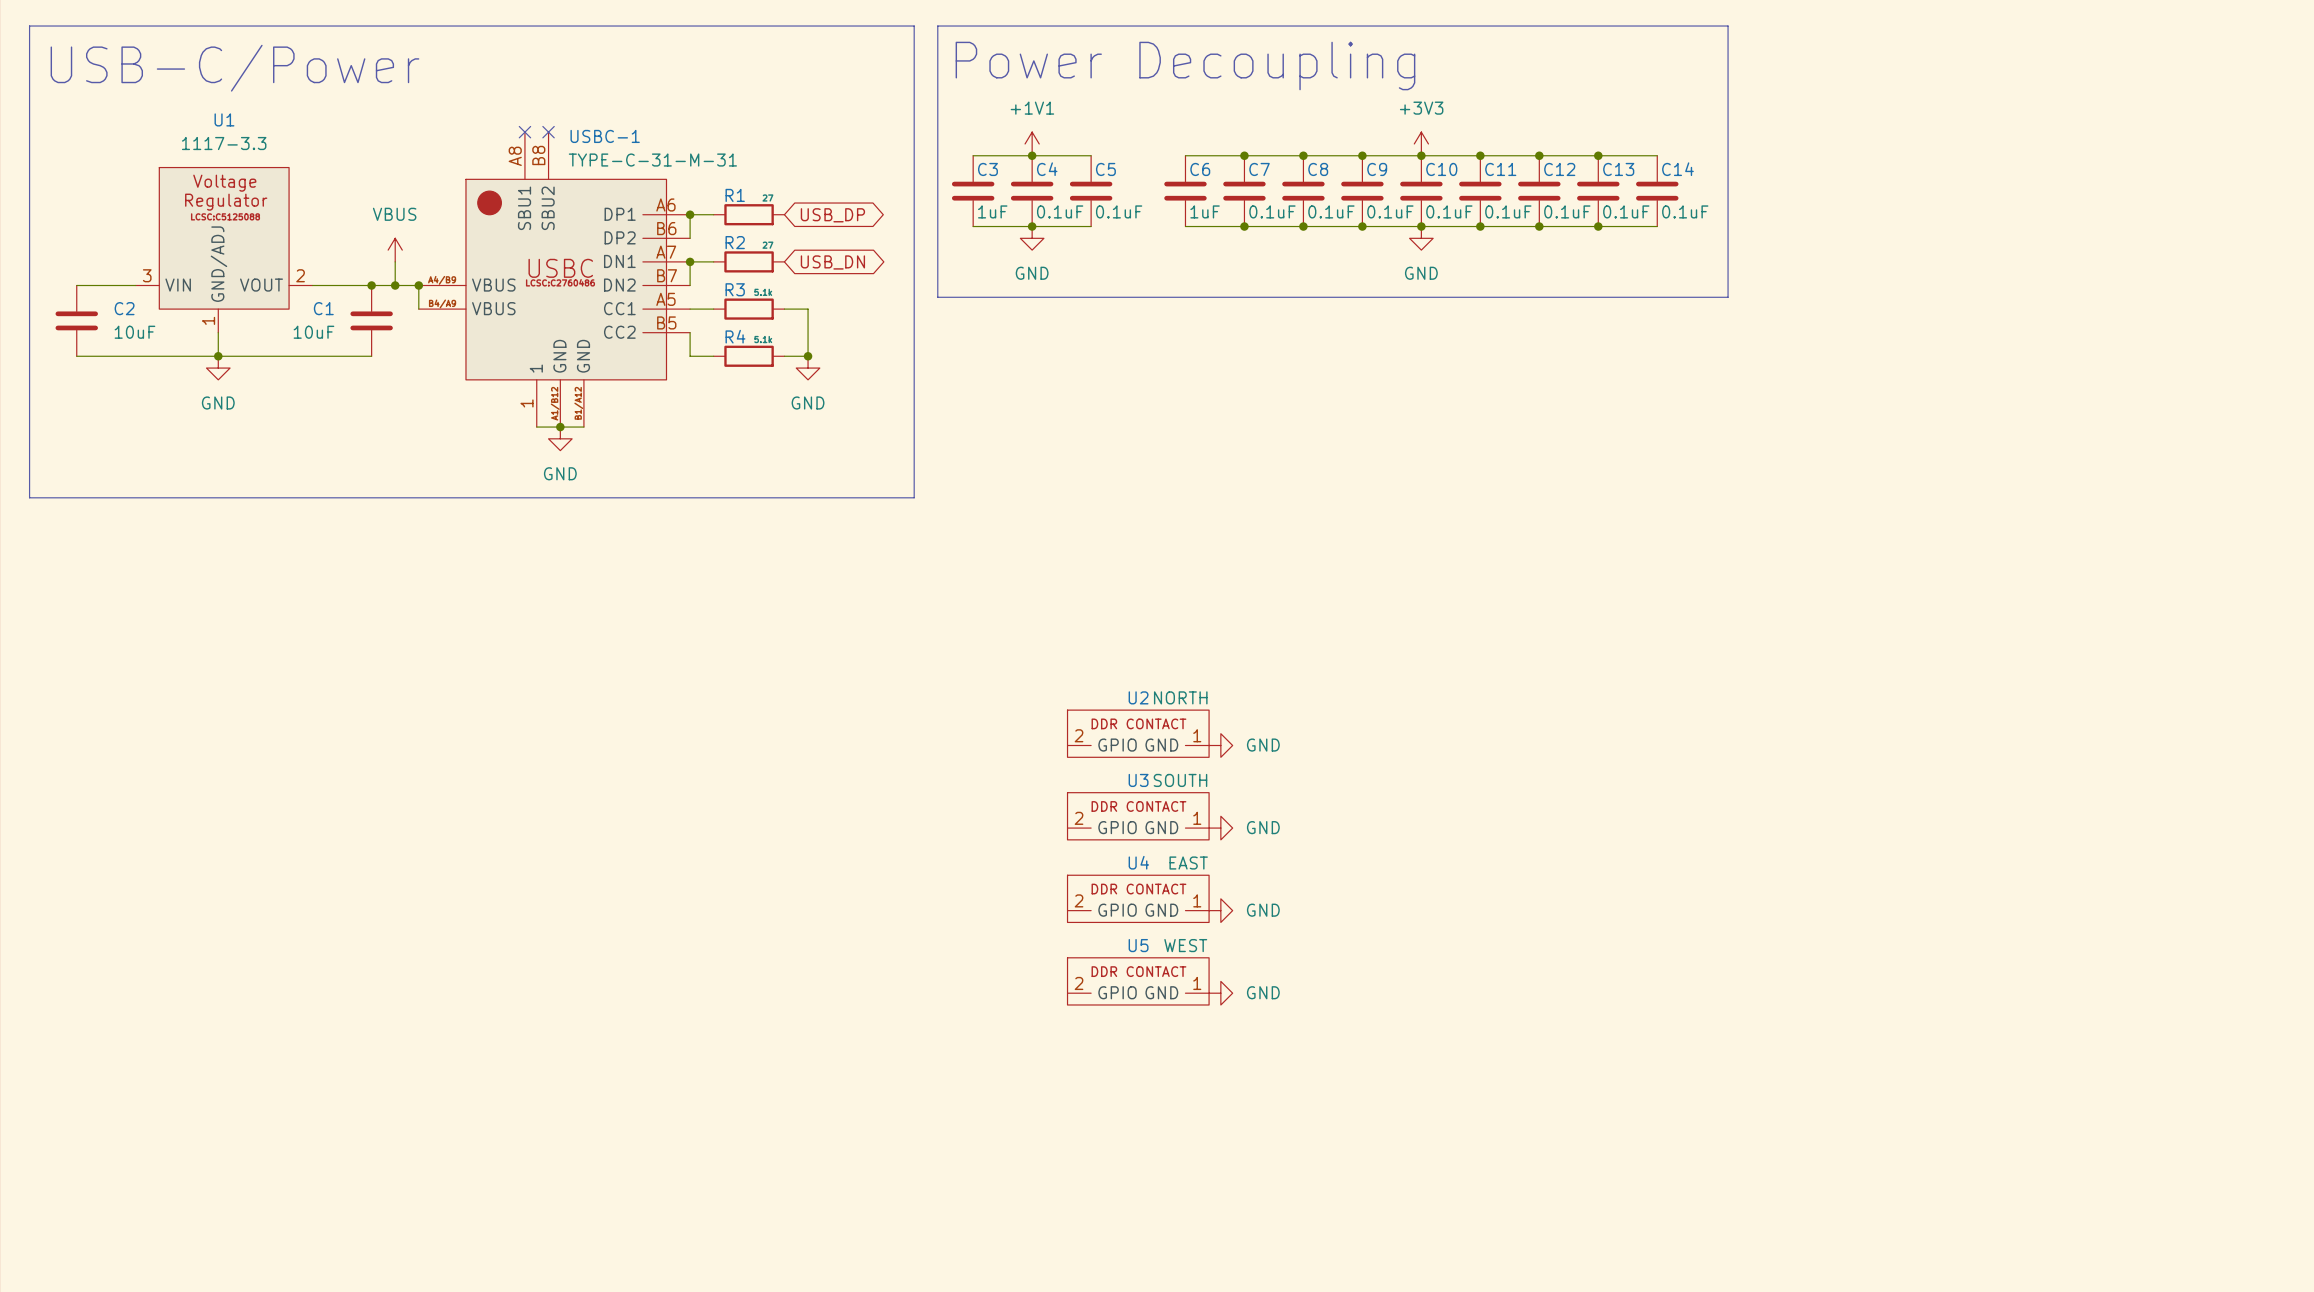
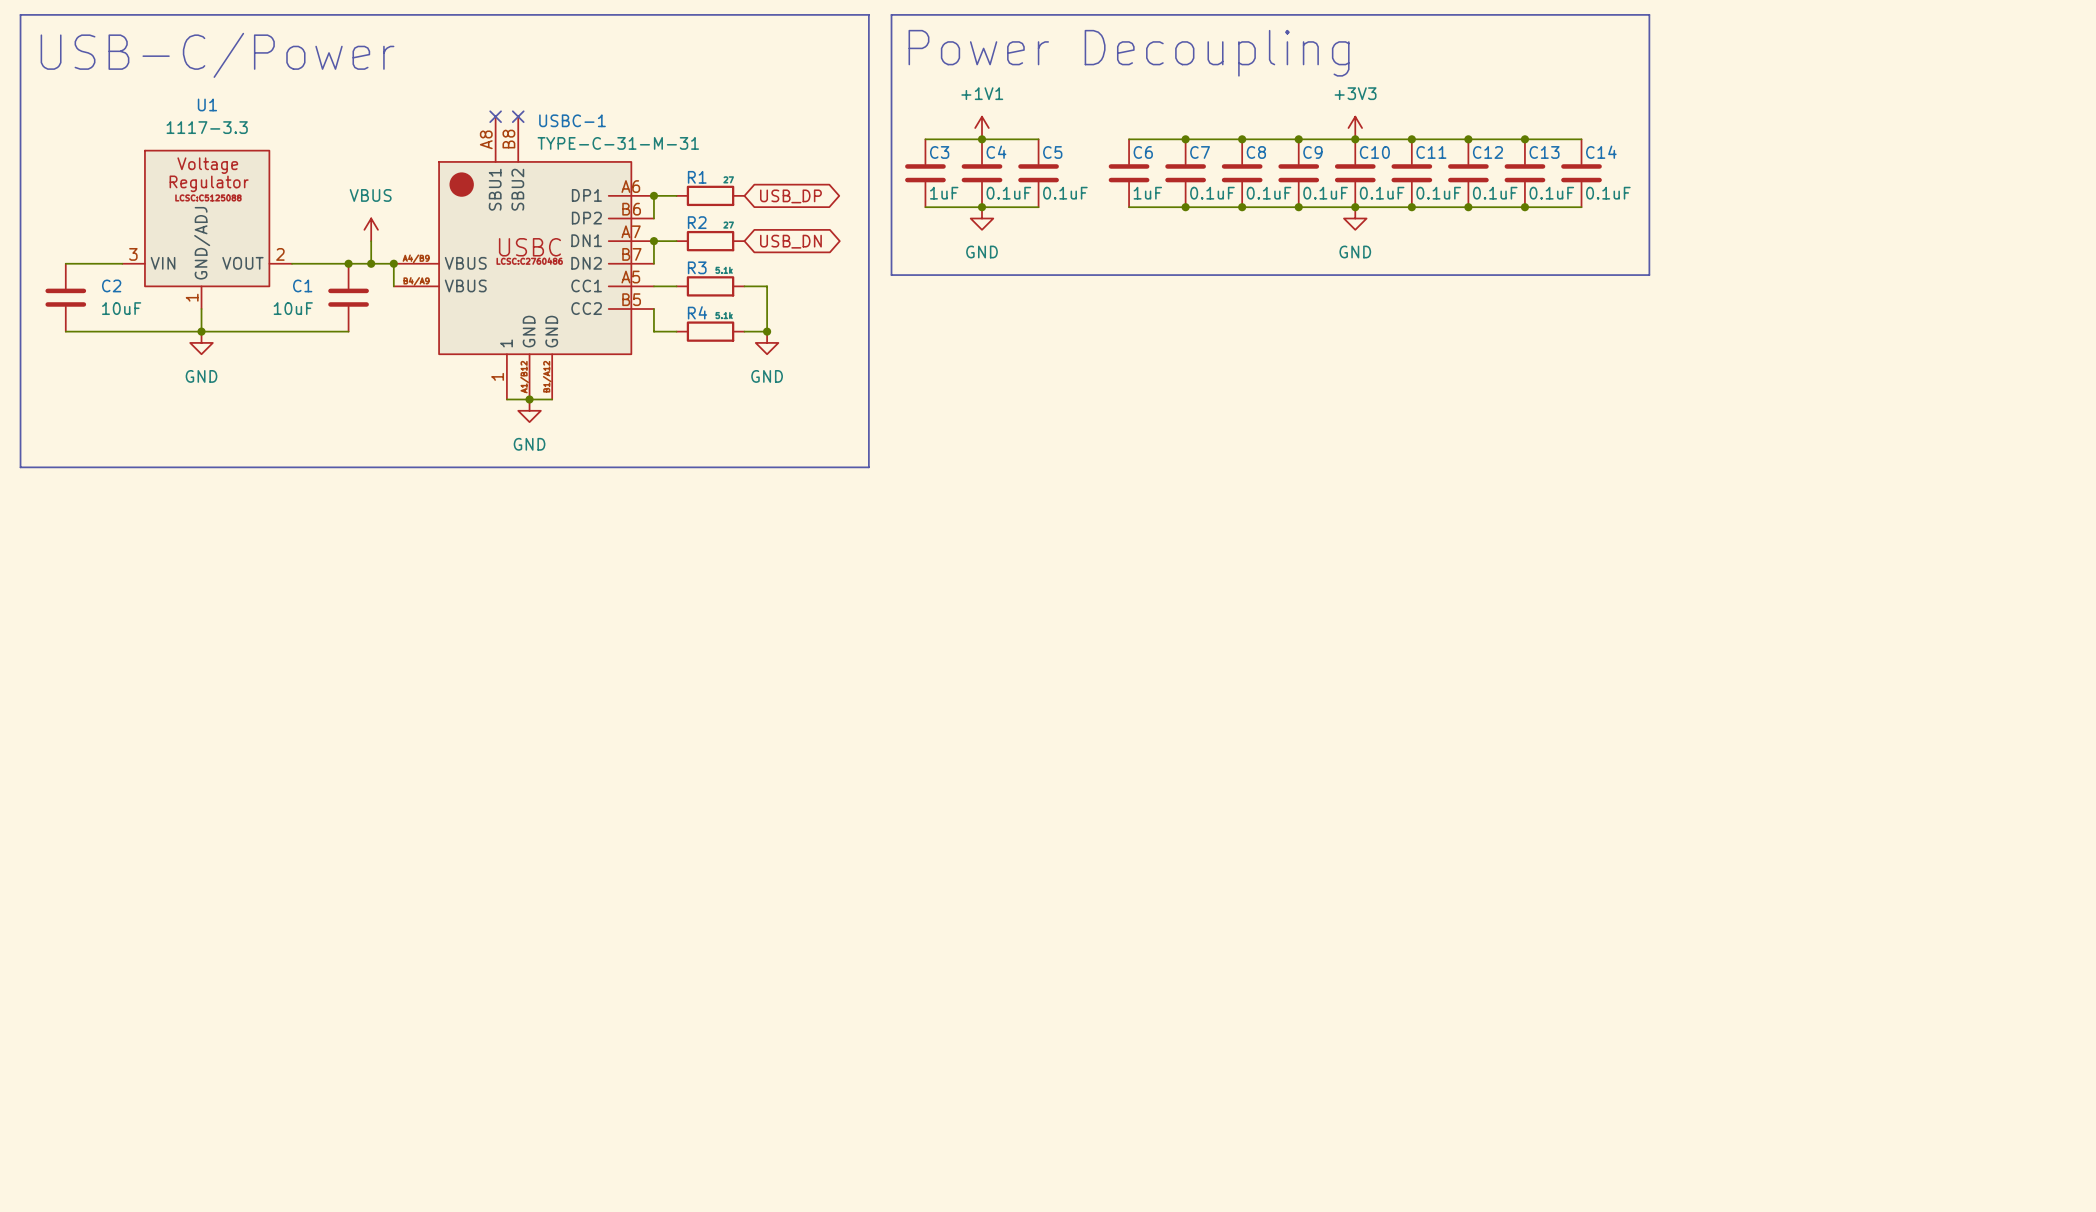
U2: NORTH (1138, 733) -> none
power symbol: GND (1220, 745) -> none
U3: SOUTH (1138, 816) -> none
power symbol: GND (1220, 828) -> none
U4: EAST (1138, 898) -> none
power symbol: GND (1220, 910) -> none
U5: WEST (1138, 981) -> none
power symbol: GND (1220, 993) -> none

